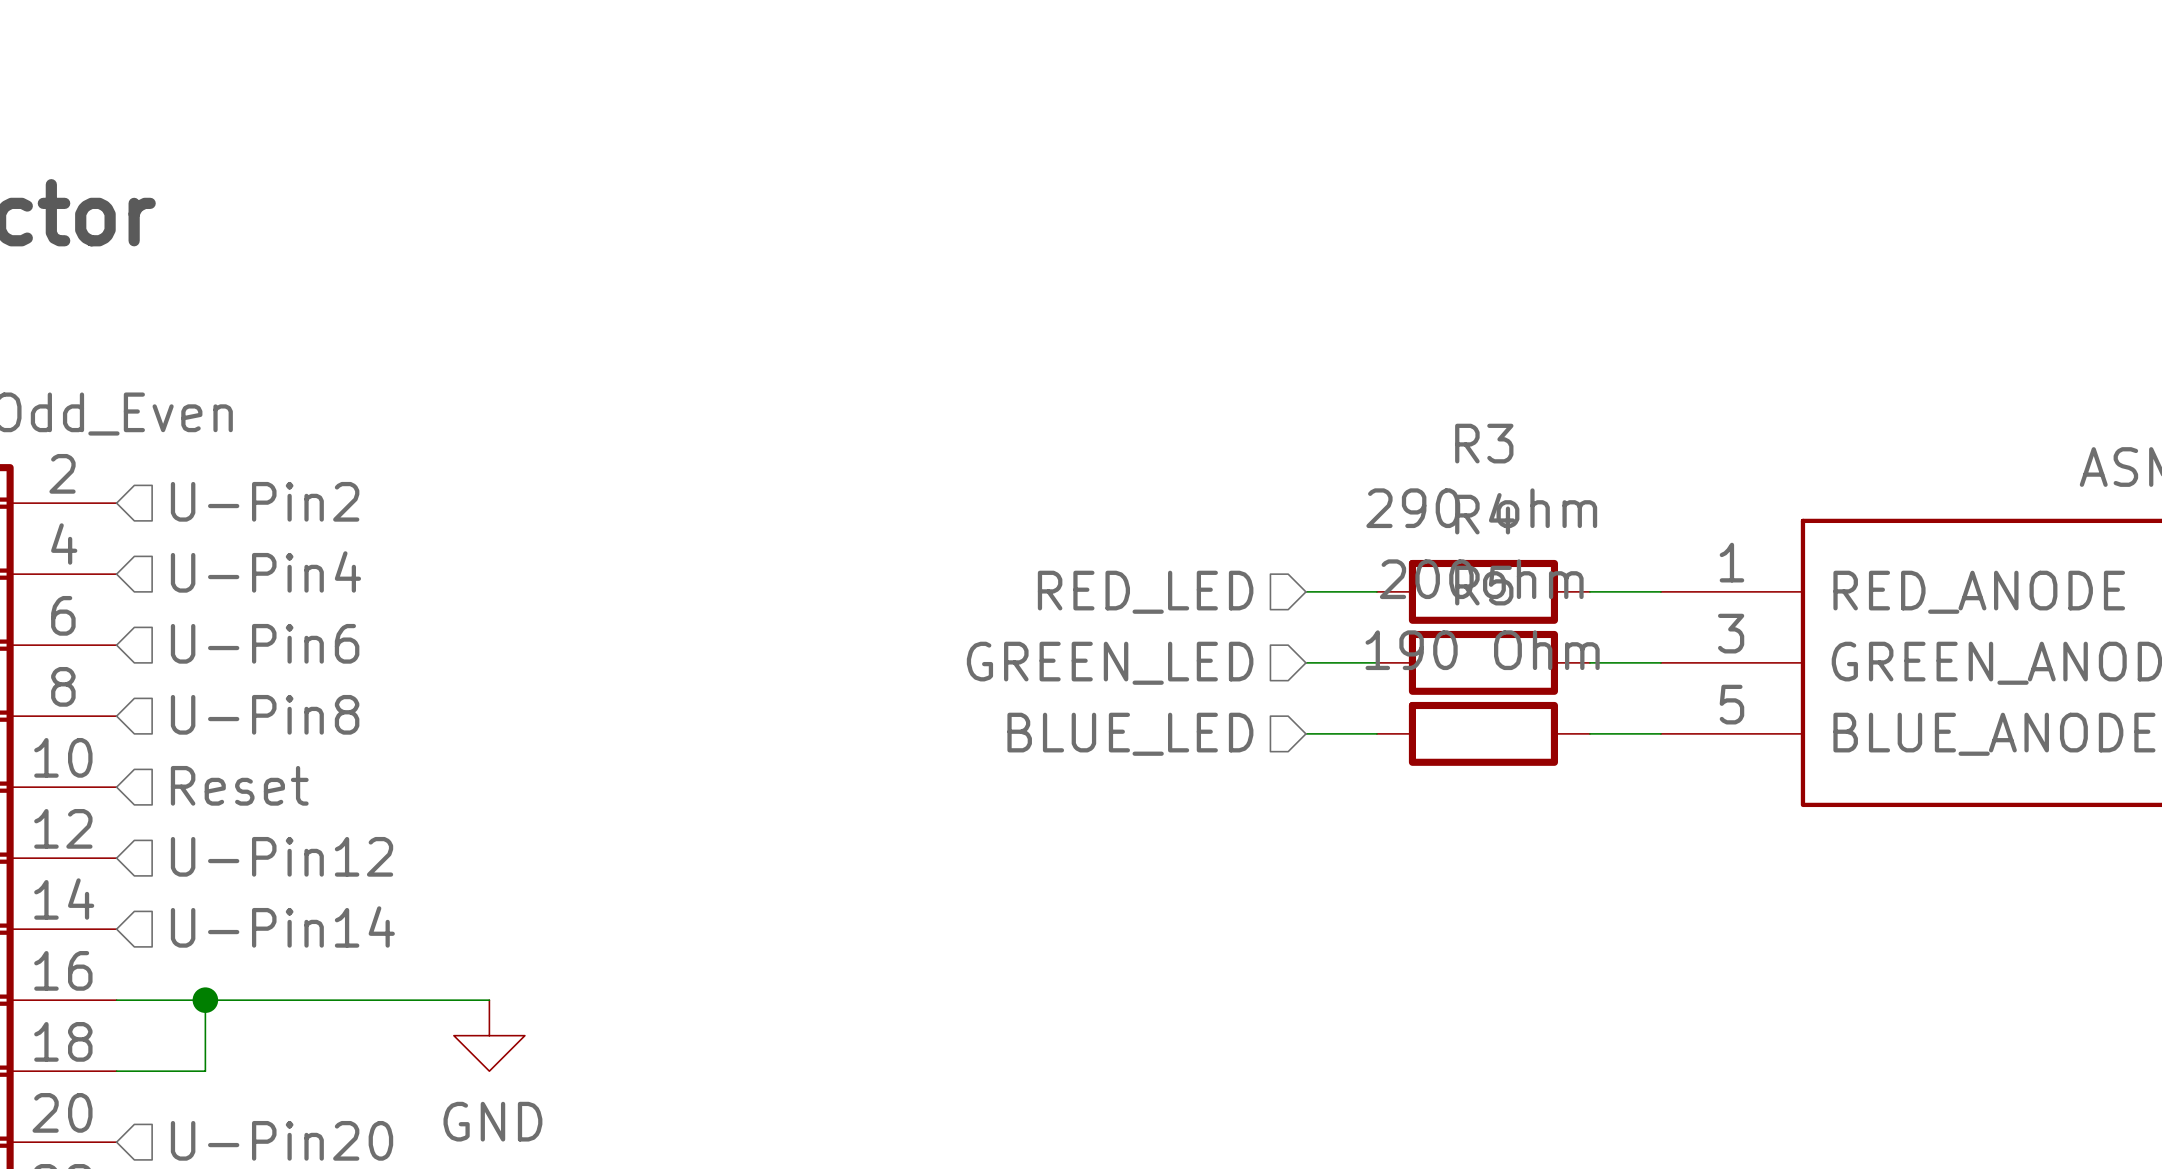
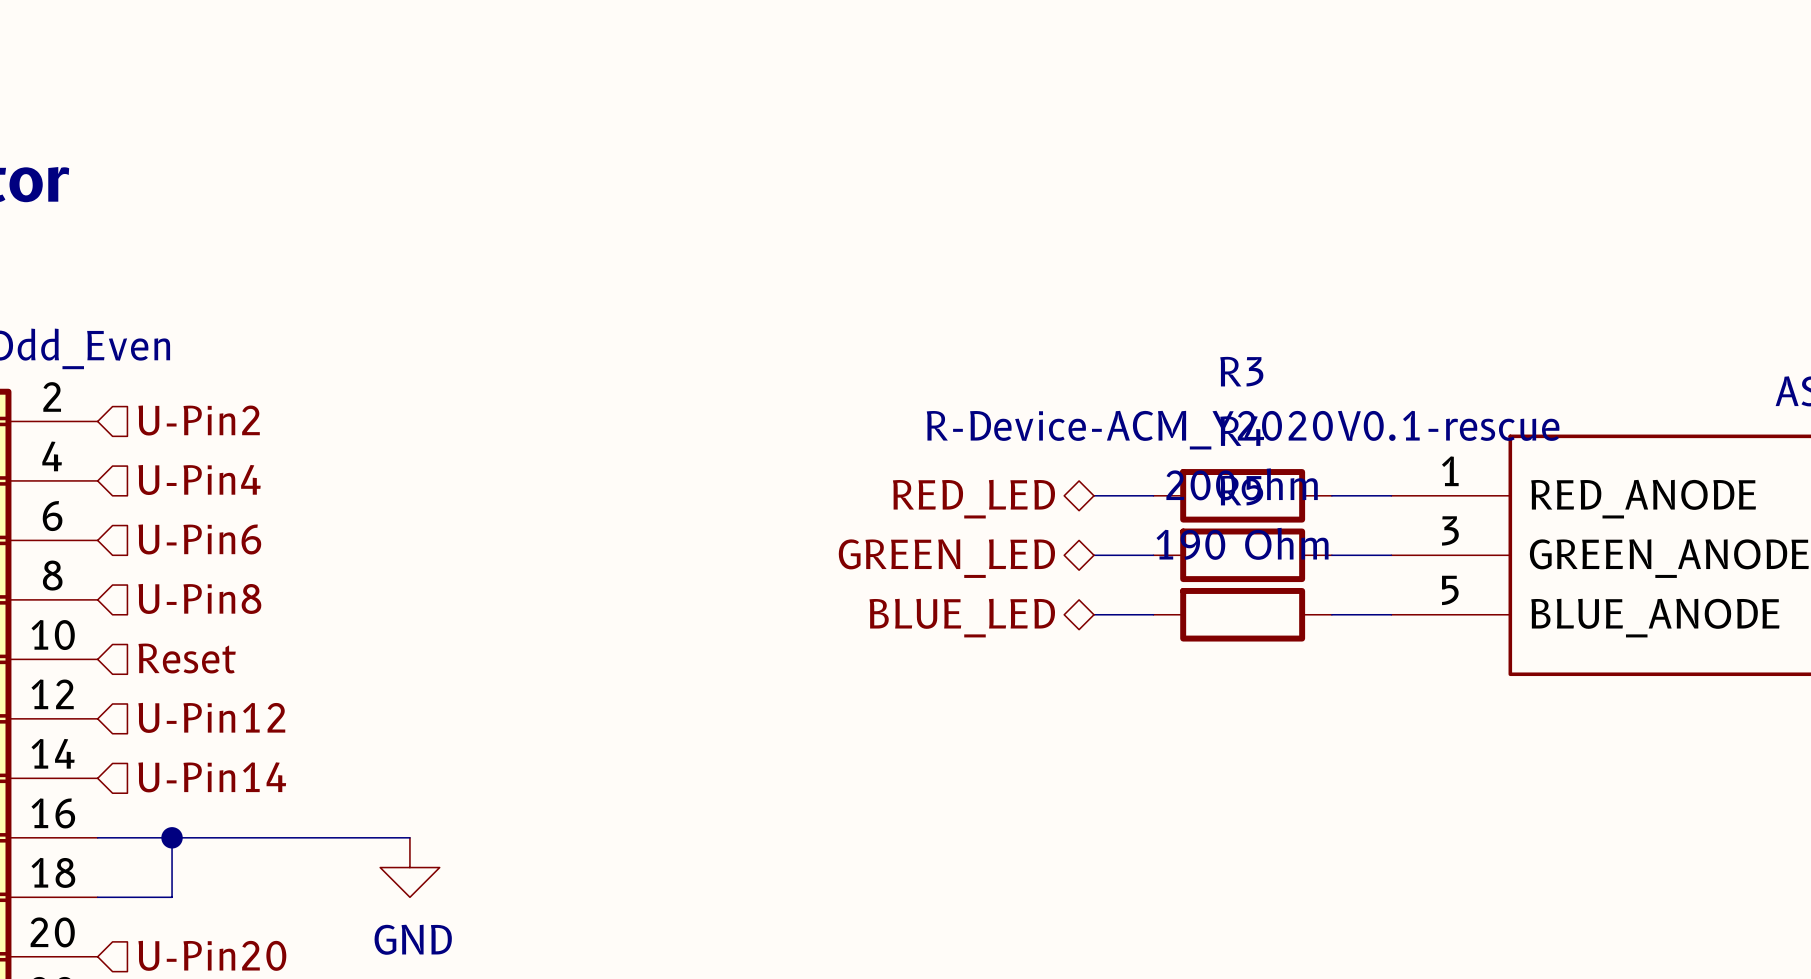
R3 value: 290 ohm (1481, 508) -> R-Device-ACM_Y2020V0.1-rescue (1243, 430)
hierarchical label shape: input (1145, 592) -> bidirectional (973, 499)
hierarchical label shape: input (1110, 663) -> bidirectional (946, 558)
hierarchical label shape: input (1130, 734) -> bidirectional (962, 618)

